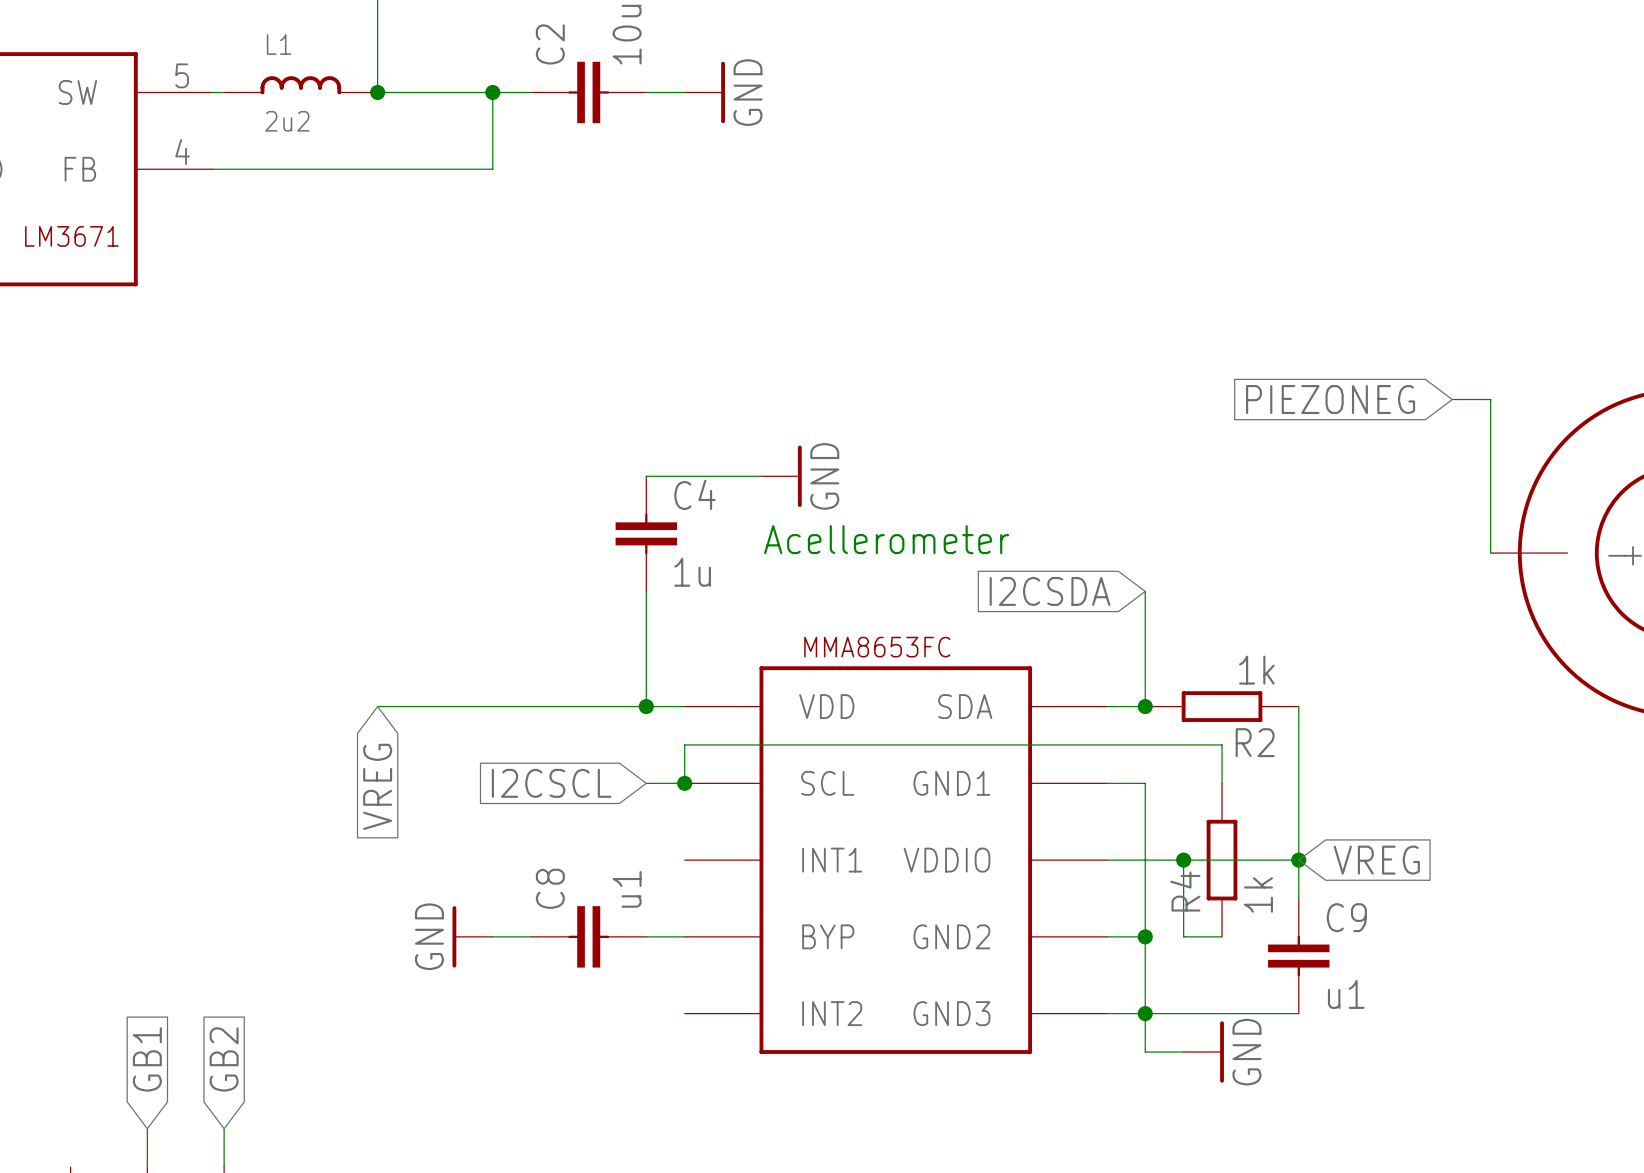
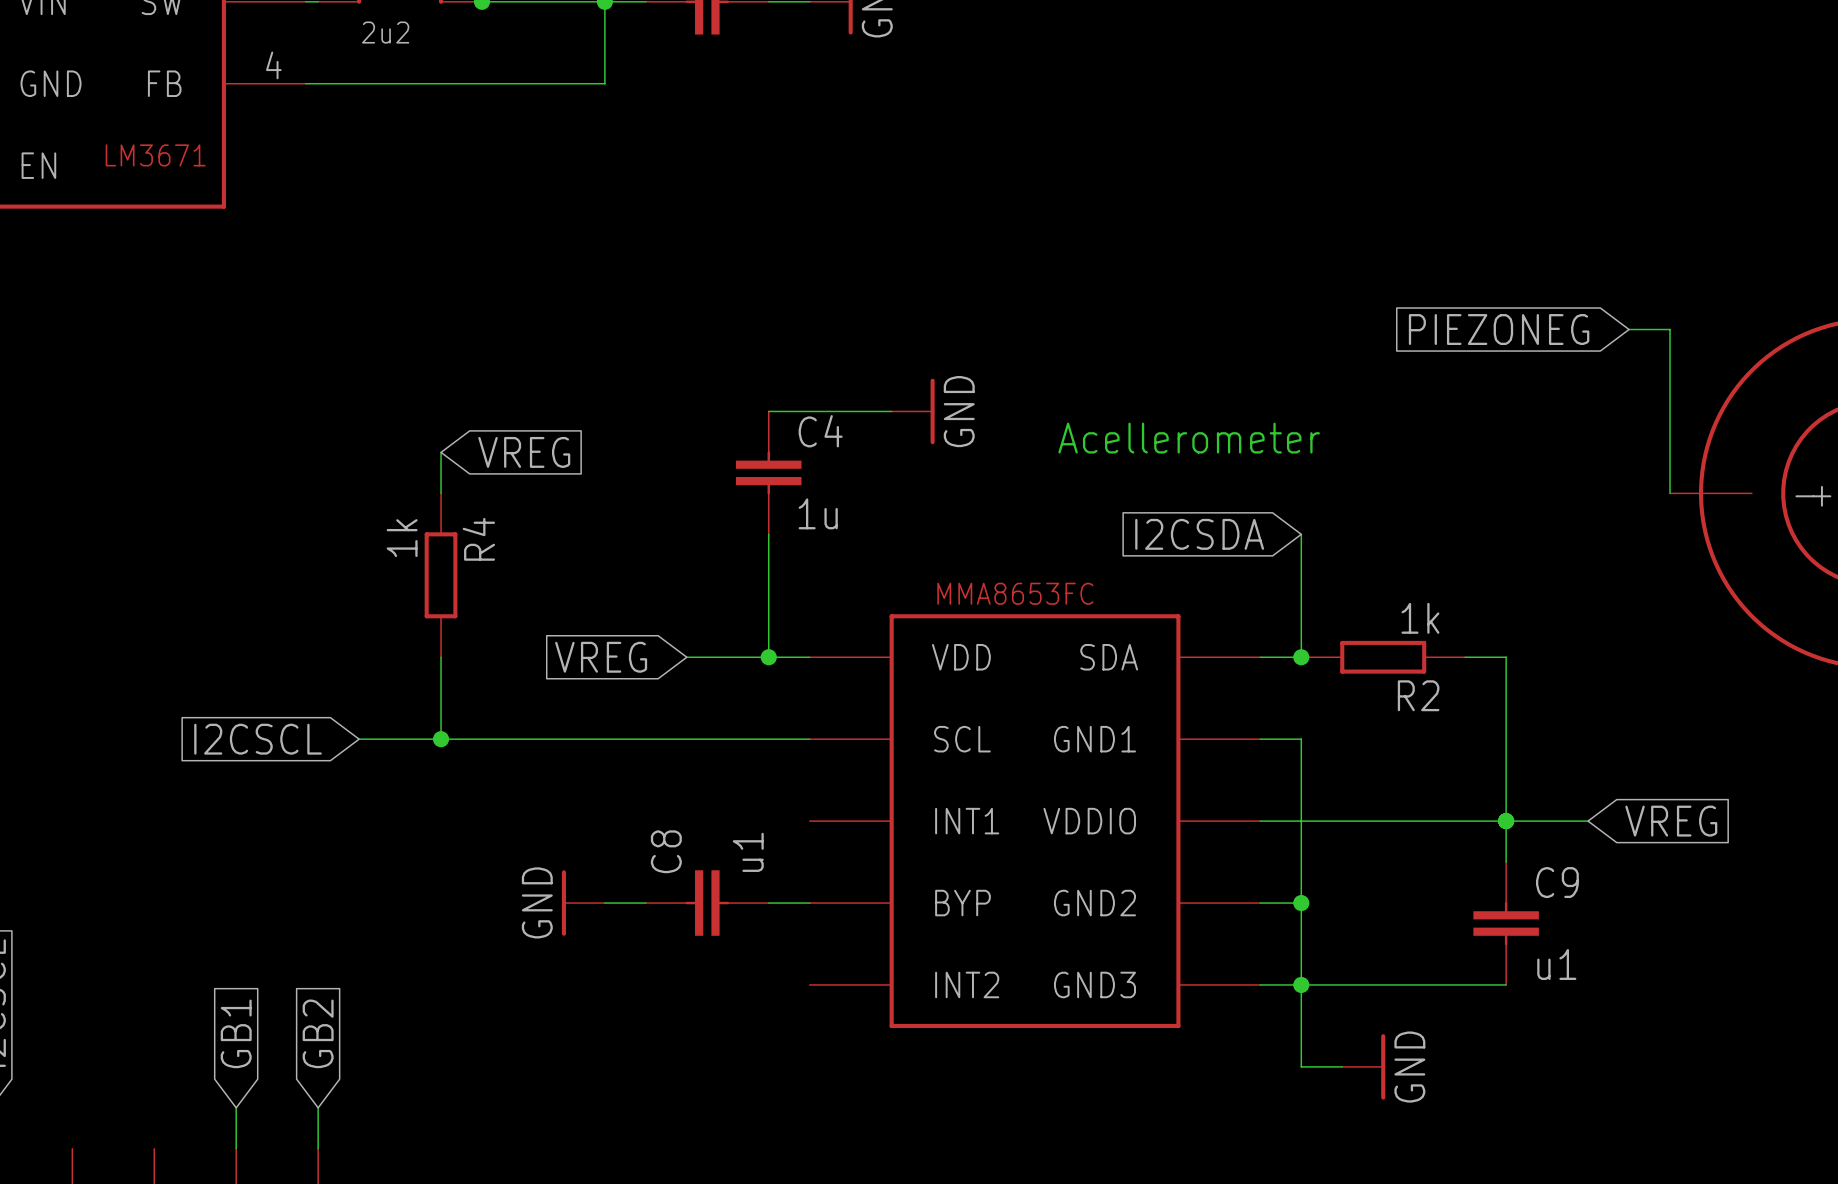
wire: none -> (441, 452) (441, 493)
global label: none -> VREG (524, 452)
text position: Acellerometer (886, 539) -> Acellerometer (1189, 438)
wire: none -> (441, 657) (441, 739)
wire: (377, 706) (569, 706) -> none
wire: (1298, 706) (1298, 898) -> (1465, 657) (1506, 657) (1506, 862)
global label: none -> I2CSCL (258, 739)
wire: none -> (359, 739) (768, 739)
junction: none -> (441, 739)
global label: I2CSCL (551, 783) -> none
wire: (684, 783) (684, 744) (1222, 744) (1222, 783) -> none
junction: (684, 783) -> none
global label rotation: 0° (377, 786) -> 90° clockwise (601, 657)
wire: (1183, 860) (1183, 936) (1222, 936) -> none
junction: (1183, 860) -> none
R4 position: (1222, 860) -> (441, 575)
wire: none -> (1465, 821) (1588, 821)
junction position: (1298, 860) -> (1506, 821)
global label position: VREG (1376, 860) -> VREG (1671, 821)
R4 name position: R4 (1185, 891) -> R4 (478, 539)
R4 value position: 1k (1258, 894) -> 1k (402, 538)
C9 position: (1298, 956) -> (1506, 923)
wire: none -> (1465, 984) (1506, 984)
wire: (1145, 1052) (1183, 1052) -> (1301, 1025) (1301, 1066) (1342, 1066)
power symbol position: GND (1203, 1052) -> GND (1363, 1066)

